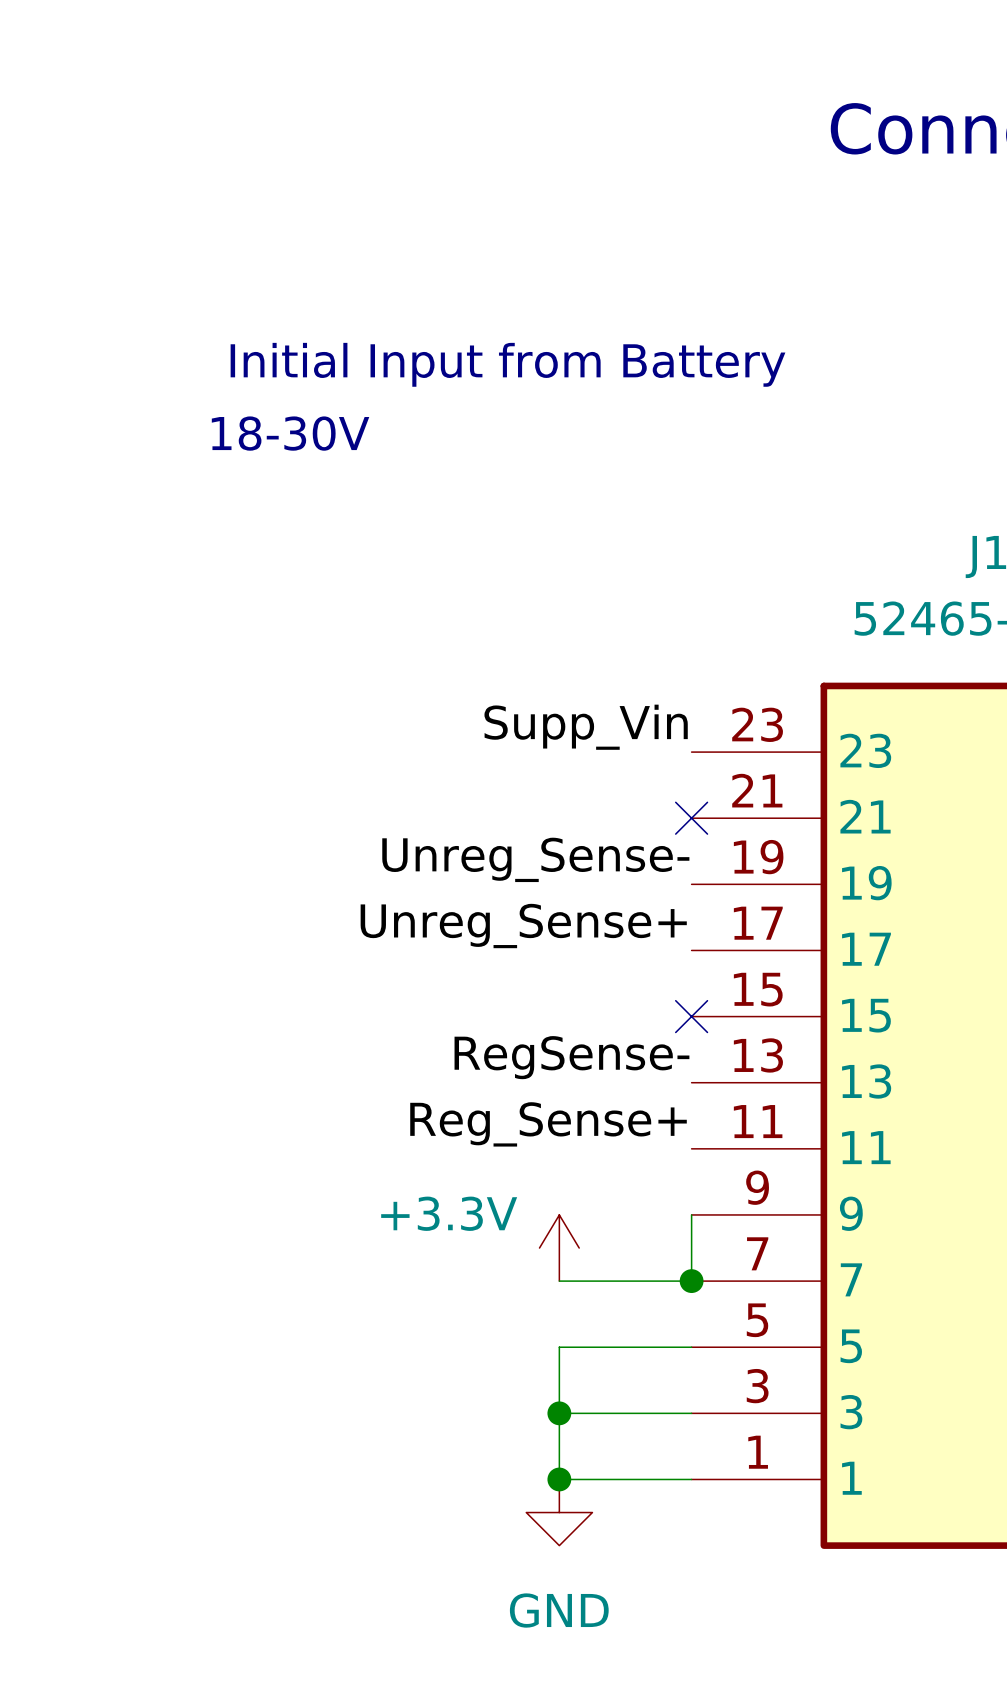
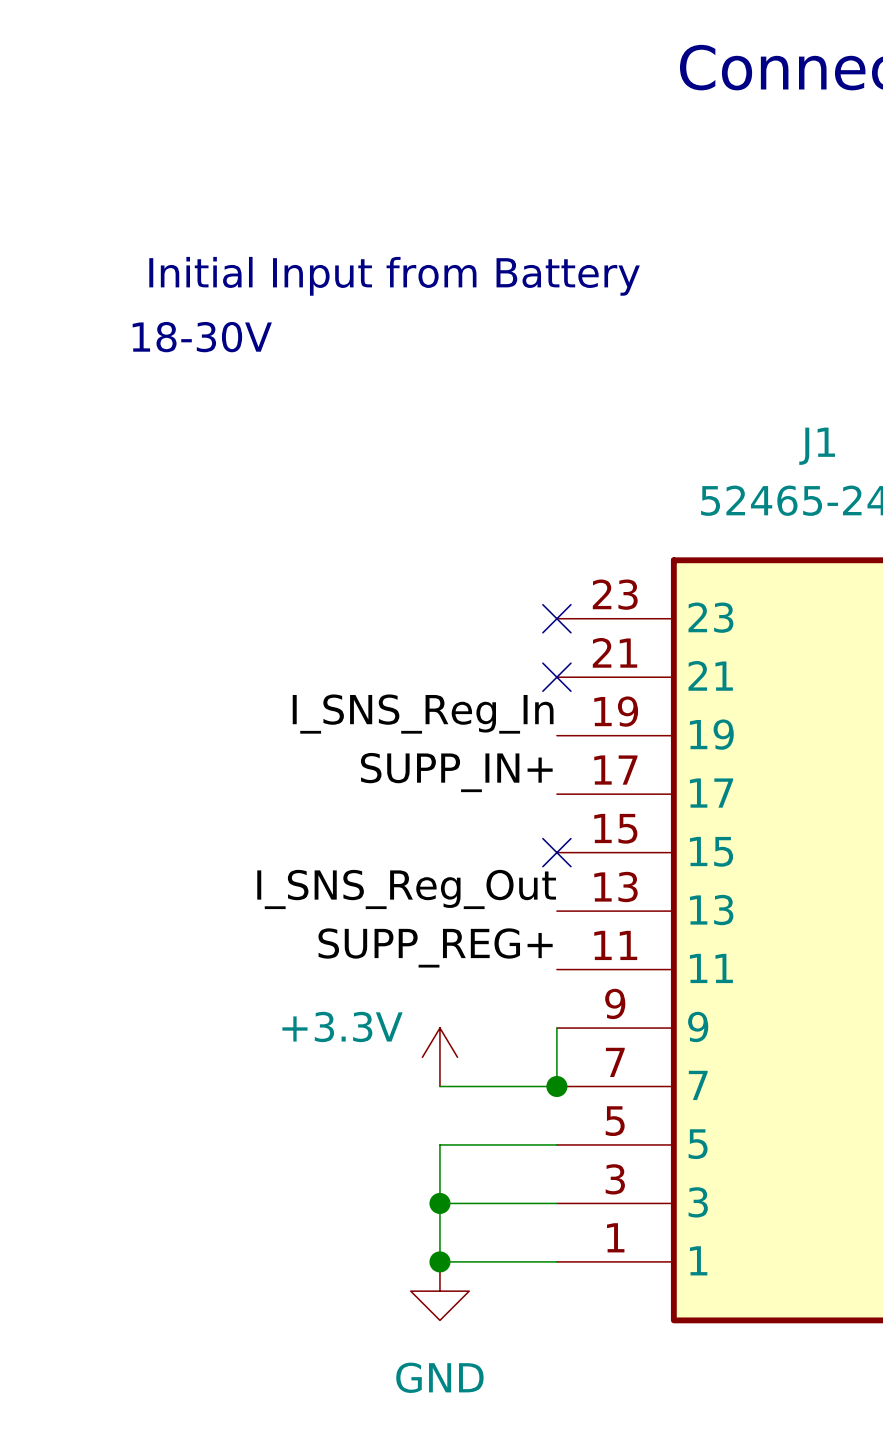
label: Supp_Vin (586, 727) -> none
no-connect mark: none -> (556, 618)
label: Unreg_Sense- (535, 859) -> I_SNS_Reg_In (423, 714)
label: Unreg_Sense+ (523, 926) -> SUPP_IN+ (456, 772)
label: RegSense- (571, 1057) -> I_SNS_Reg_Out (406, 889)
label: Reg_Sense+ (548, 1124) -> SUPP_REG+ (435, 947)

